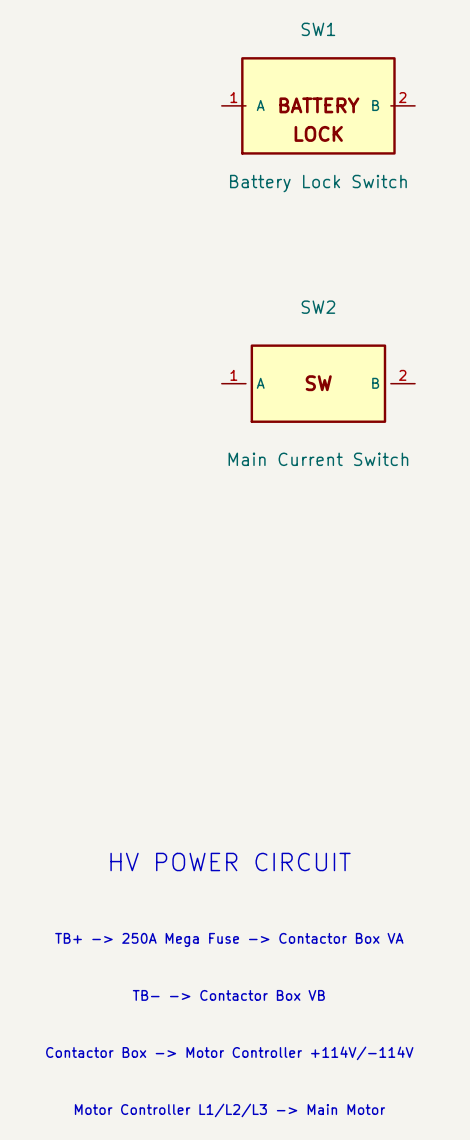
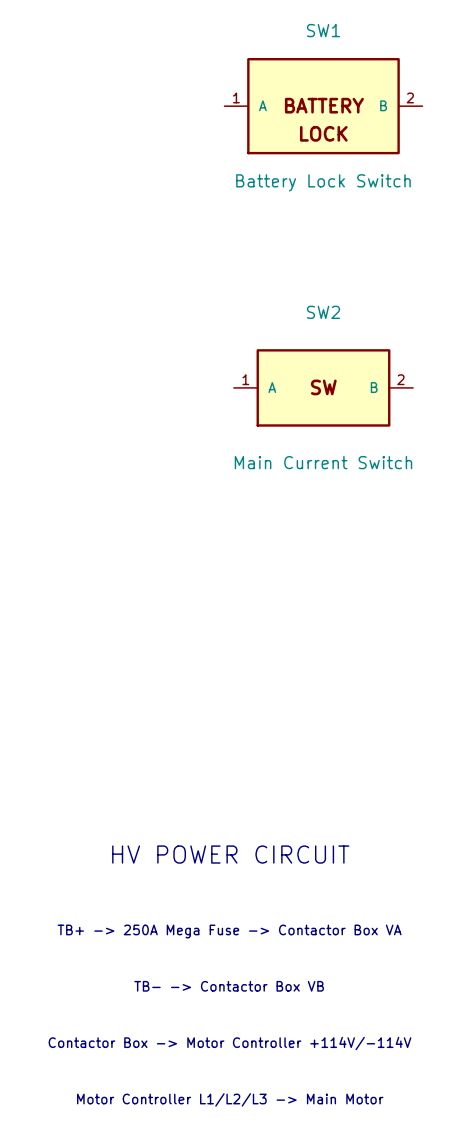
SW1 symbol: [221, 57, 416, 155] -> [224, 58, 423, 155]
SW2 symbol: [221, 344, 416, 423] -> [233, 349, 414, 427]

